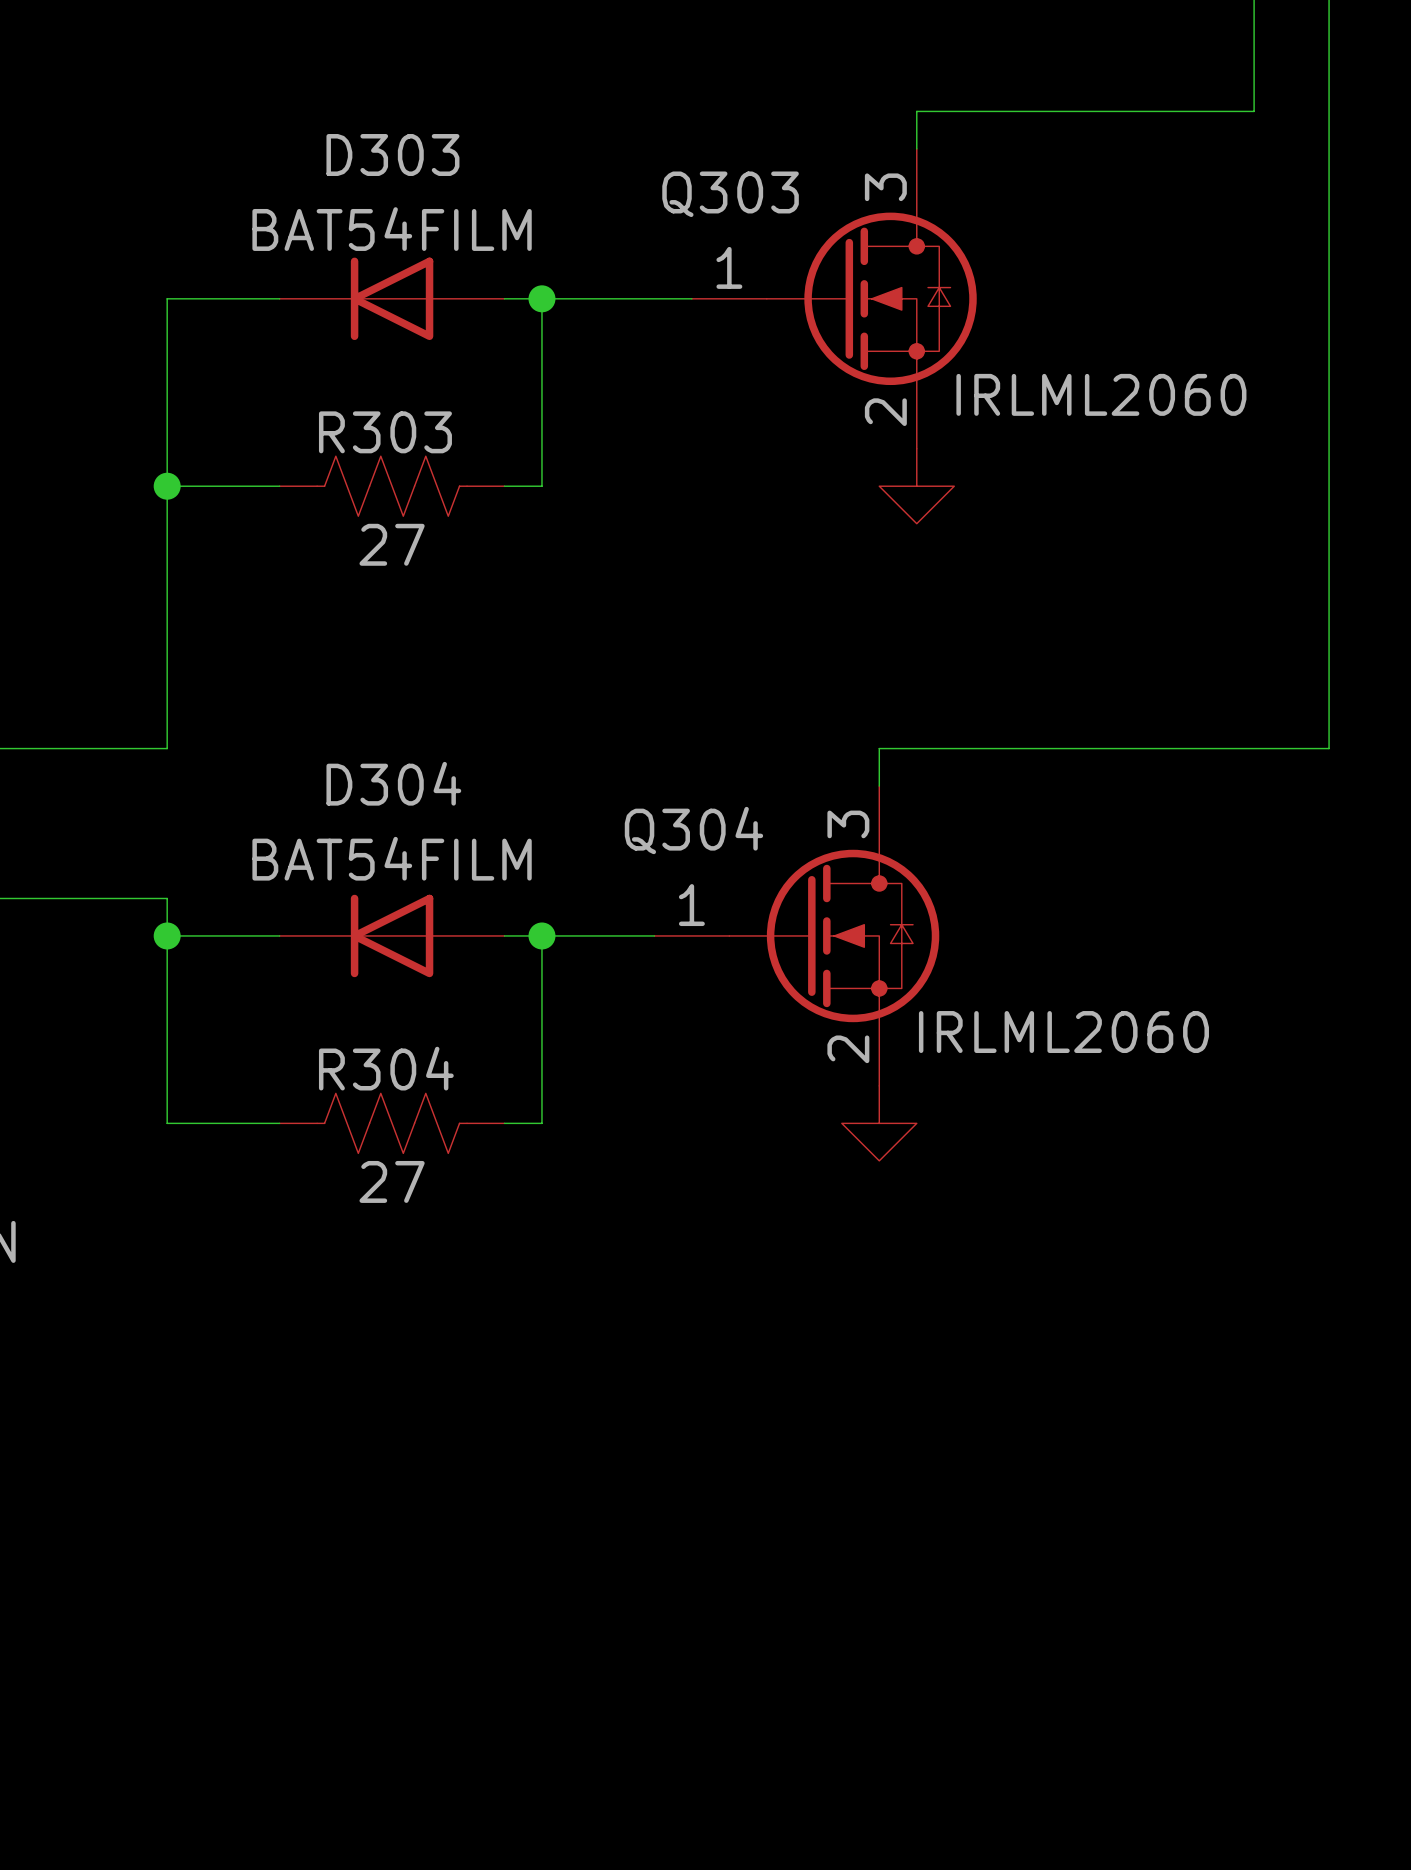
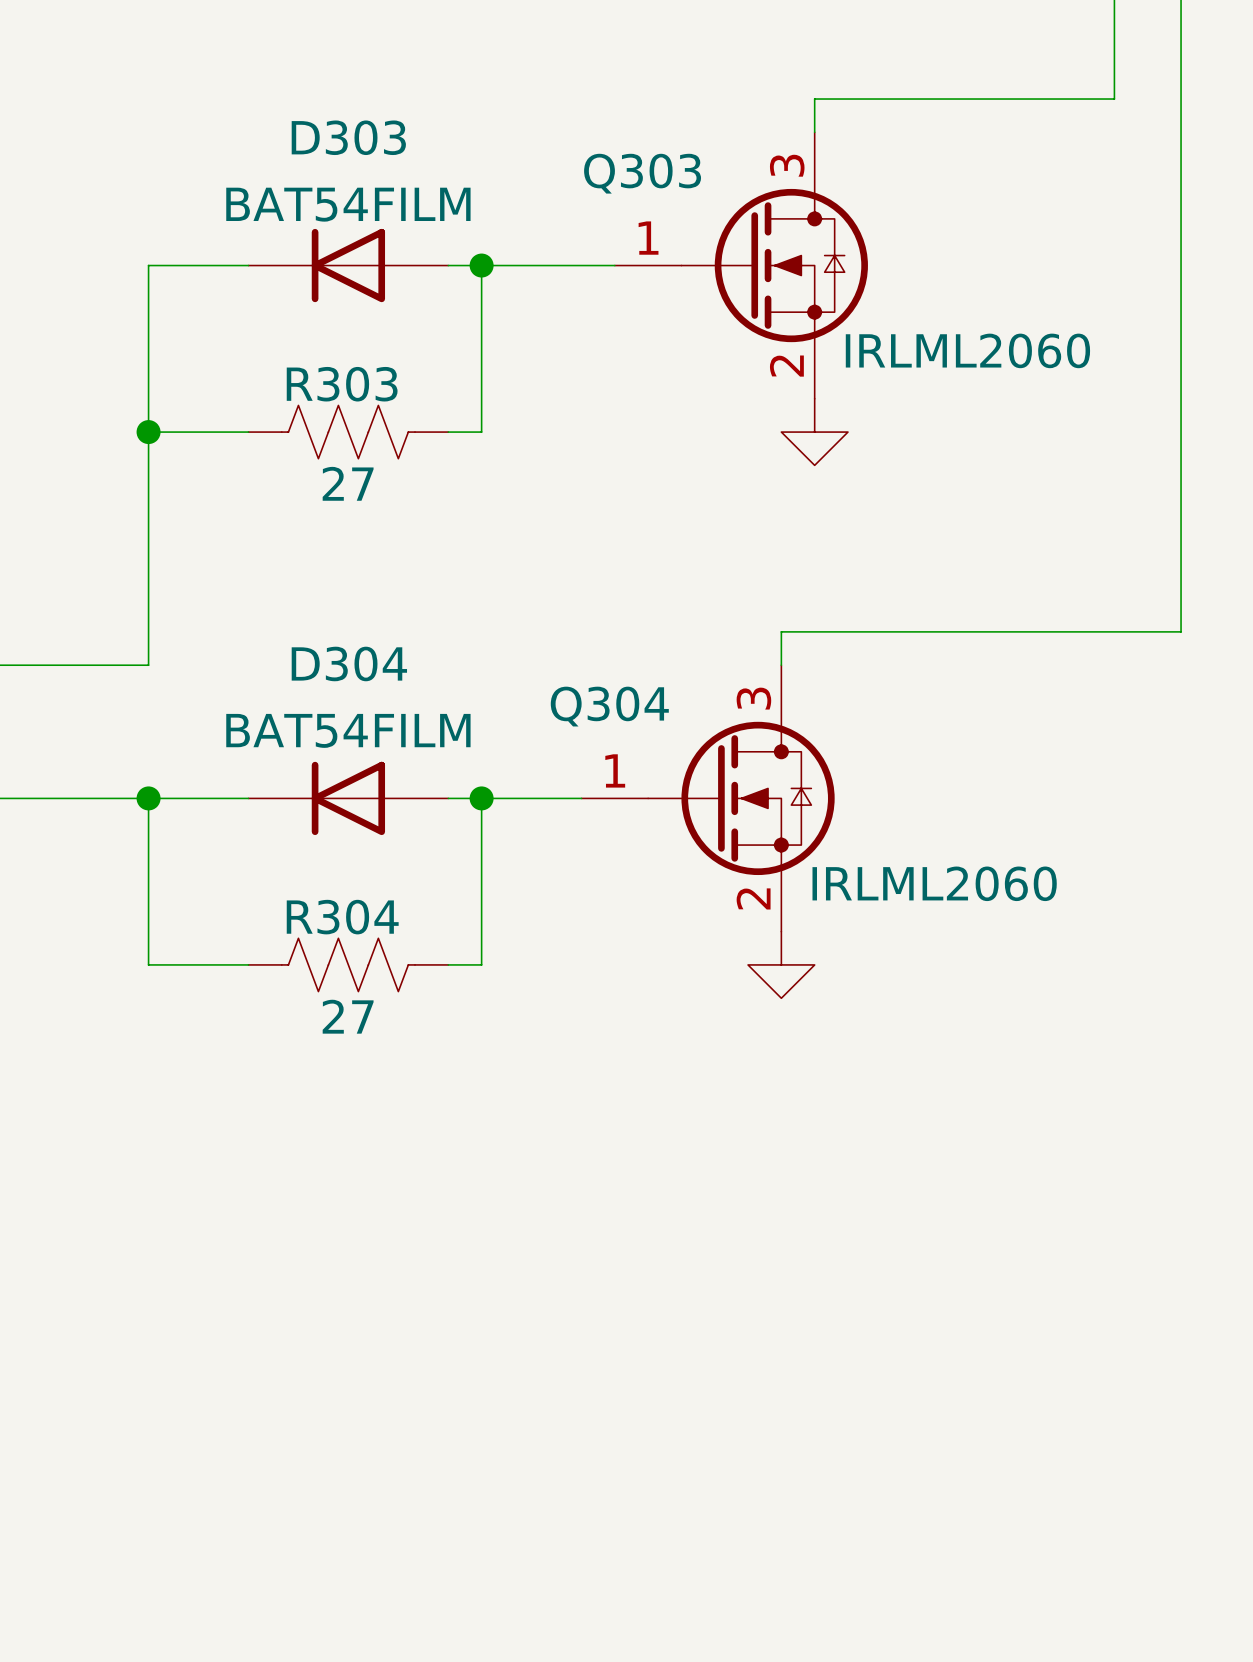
wire: (1329, 711) (1329, 748) (879, 748) (879, 786) -> (1181, 631) (781, 631) (781, 665)
wire: none -> (481, 798) (481, 831)
wire: (167, 935) (279, 935) -> (148, 798) (248, 798)
junction position: (167, 935) -> (148, 798)
D304 position: (392, 935) -> (348, 798)
wire: (504, 935) (654, 935) -> (448, 798) (581, 798)
junction position: (541, 935) -> (481, 798)
Q304 position: (796, 935) -> (708, 798)
wire: (167, 1085) (167, 1123) (279, 1123) -> (148, 964) (248, 964)
wire: (541, 1085) (541, 1123) (504, 1123) -> (481, 964) (448, 964)
R304 position: (392, 1123) -> (348, 964)
power symbol position: (879, 1123) -> (781, 964)

